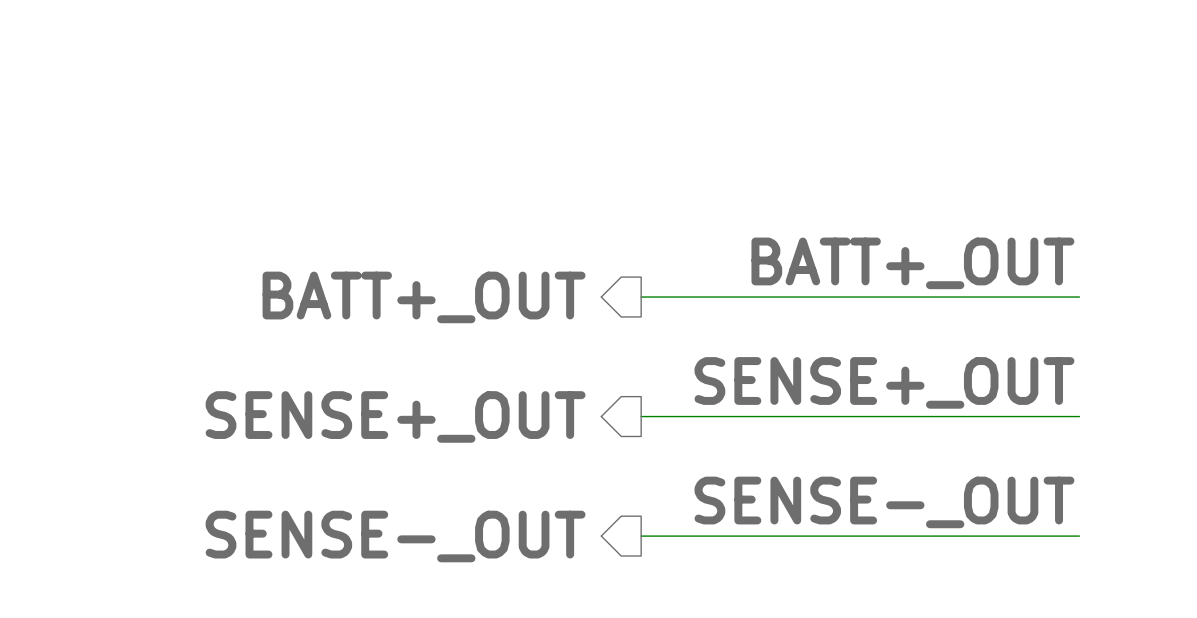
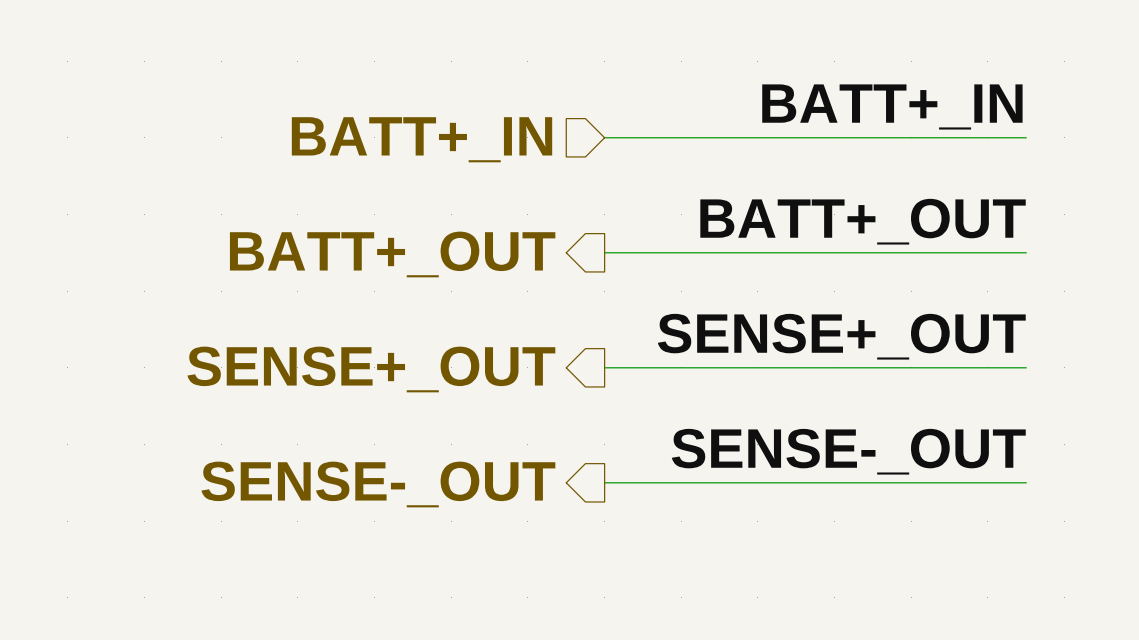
label: none -> BATT+_IN (892, 106)
hierarchical label: none -> BATT+_IN (422, 139)
wire: none -> (604, 137) (1026, 137)

